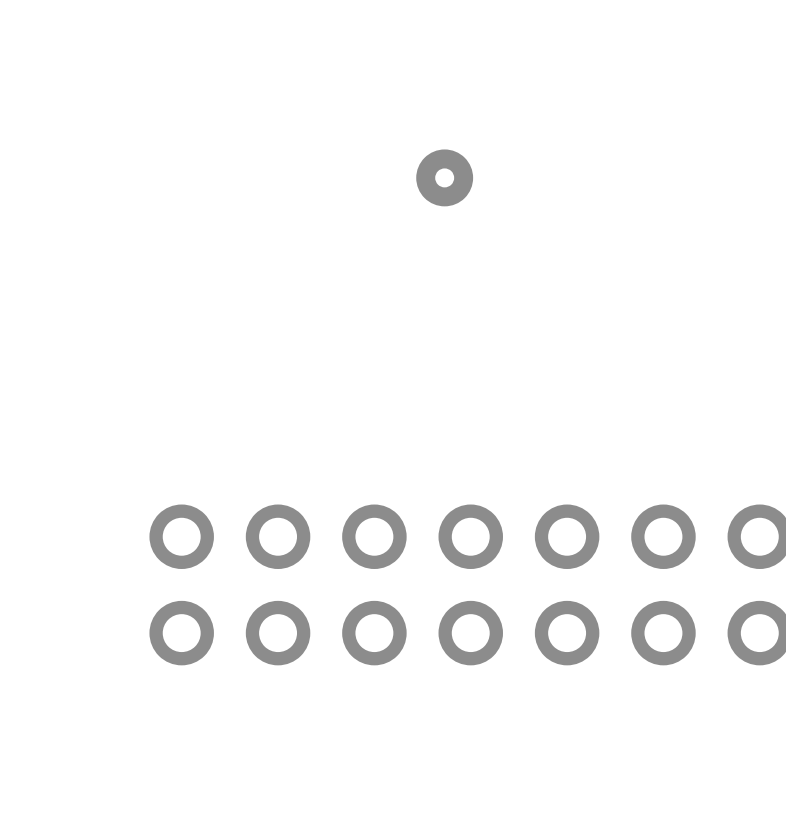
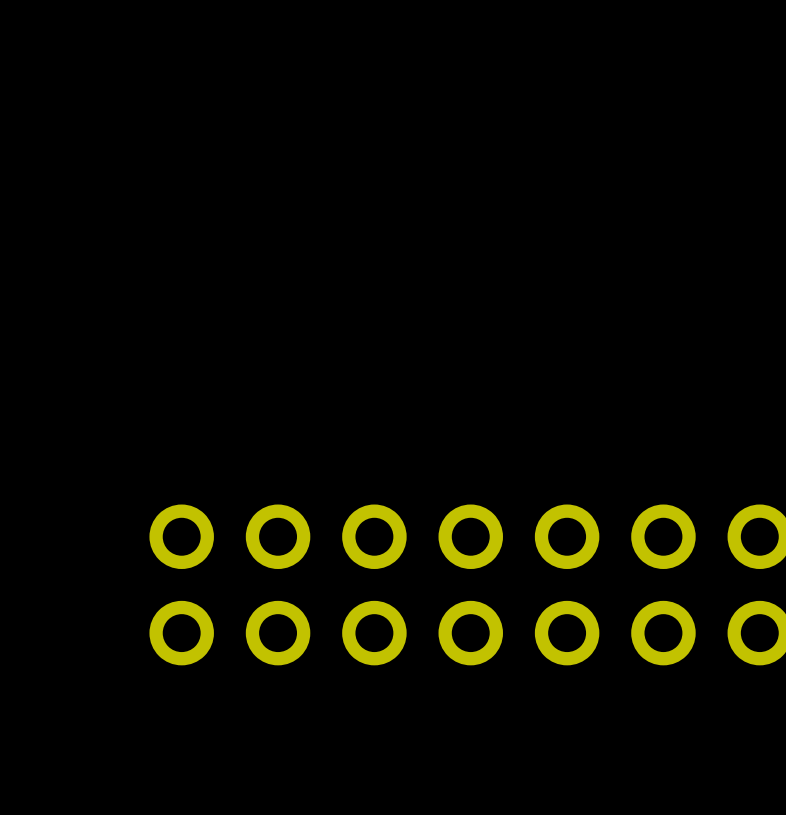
via: (444, 177) -> none

